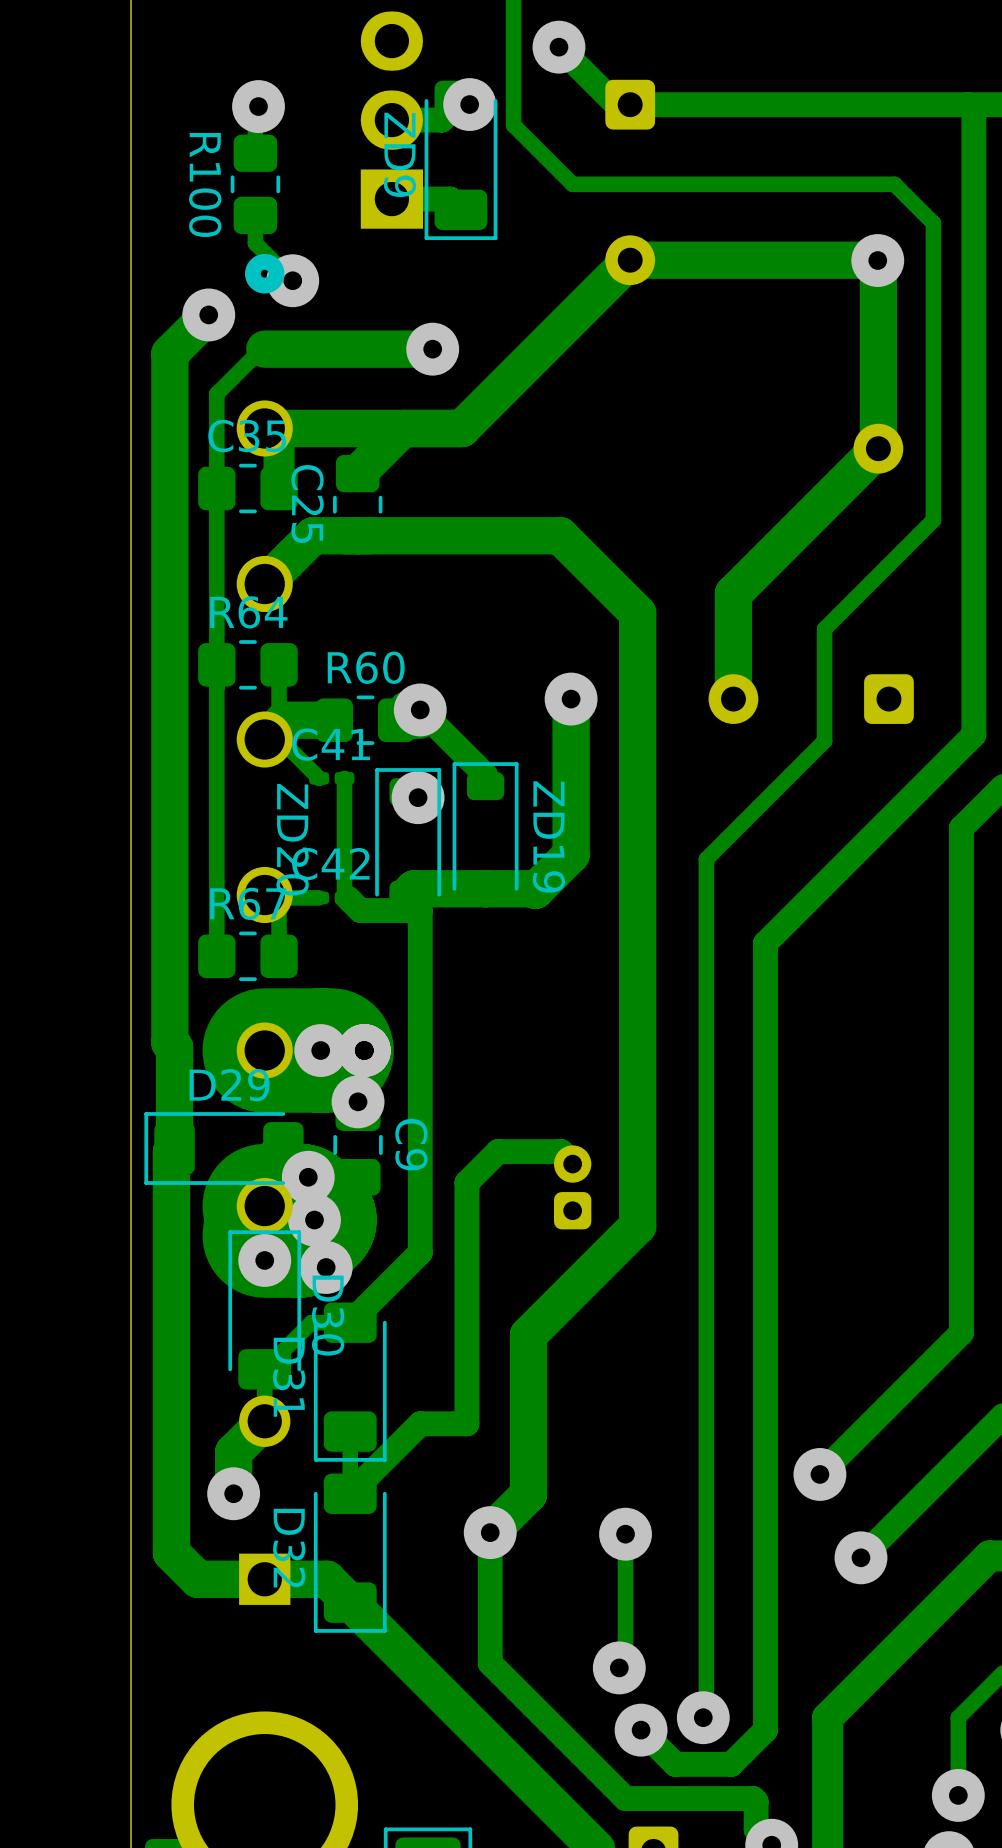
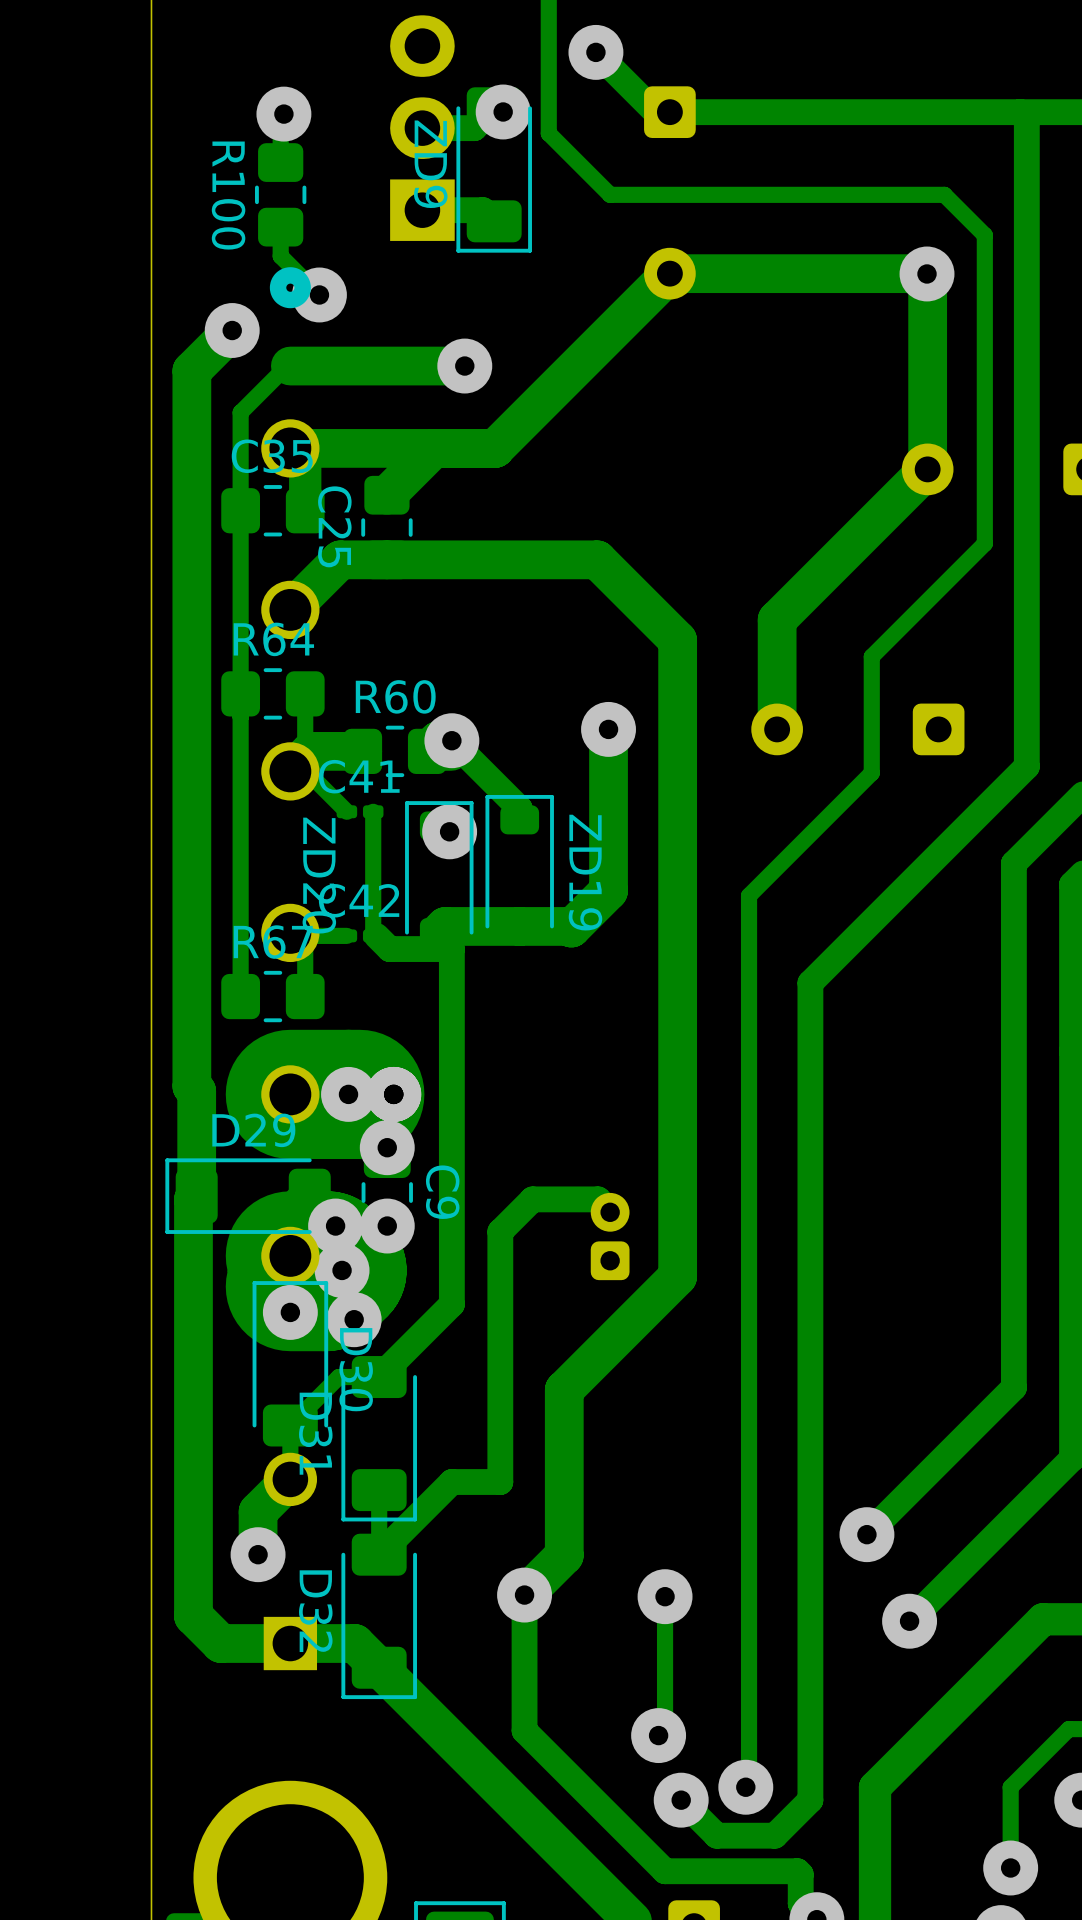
via: none -> (387, 1226)

